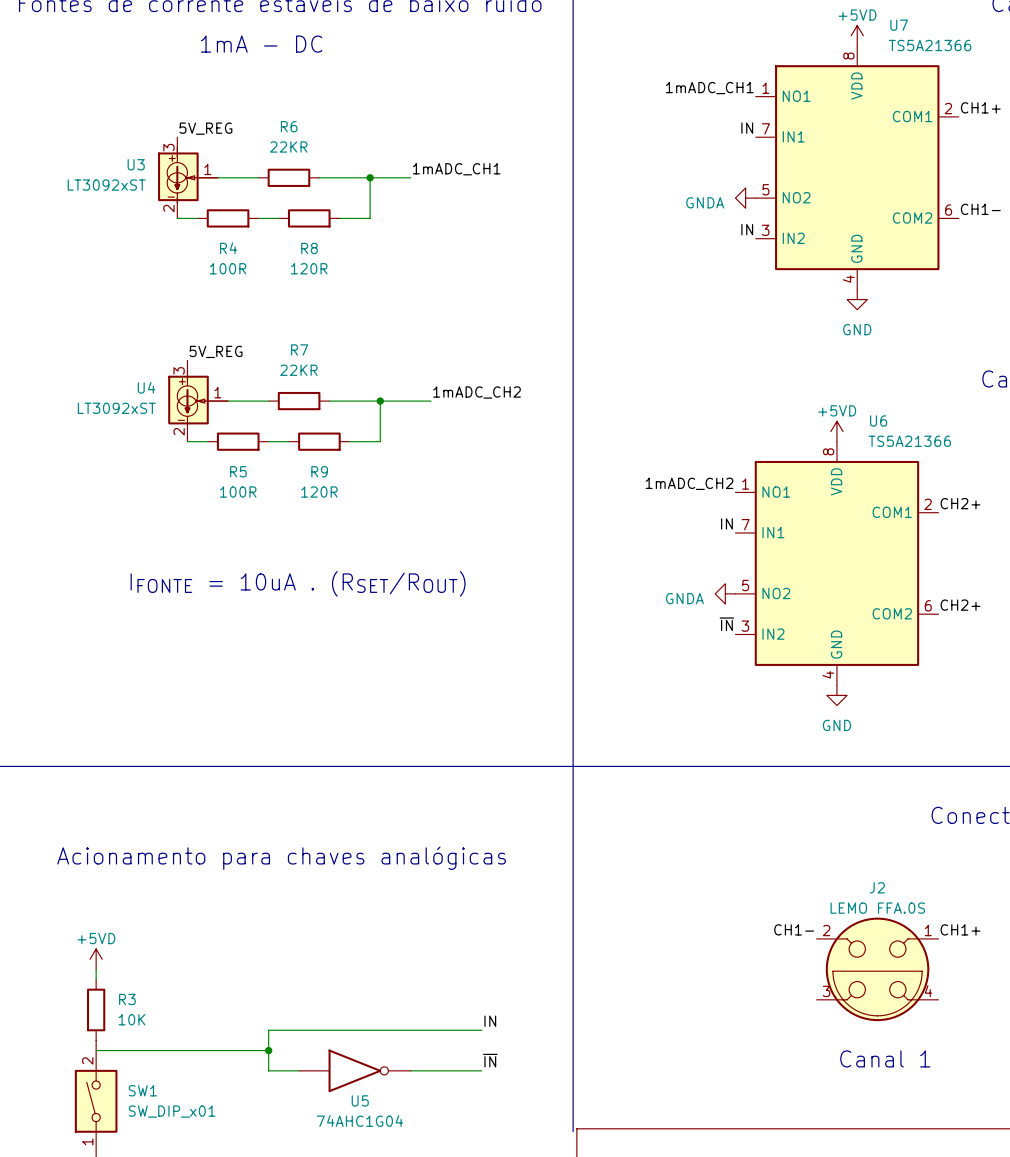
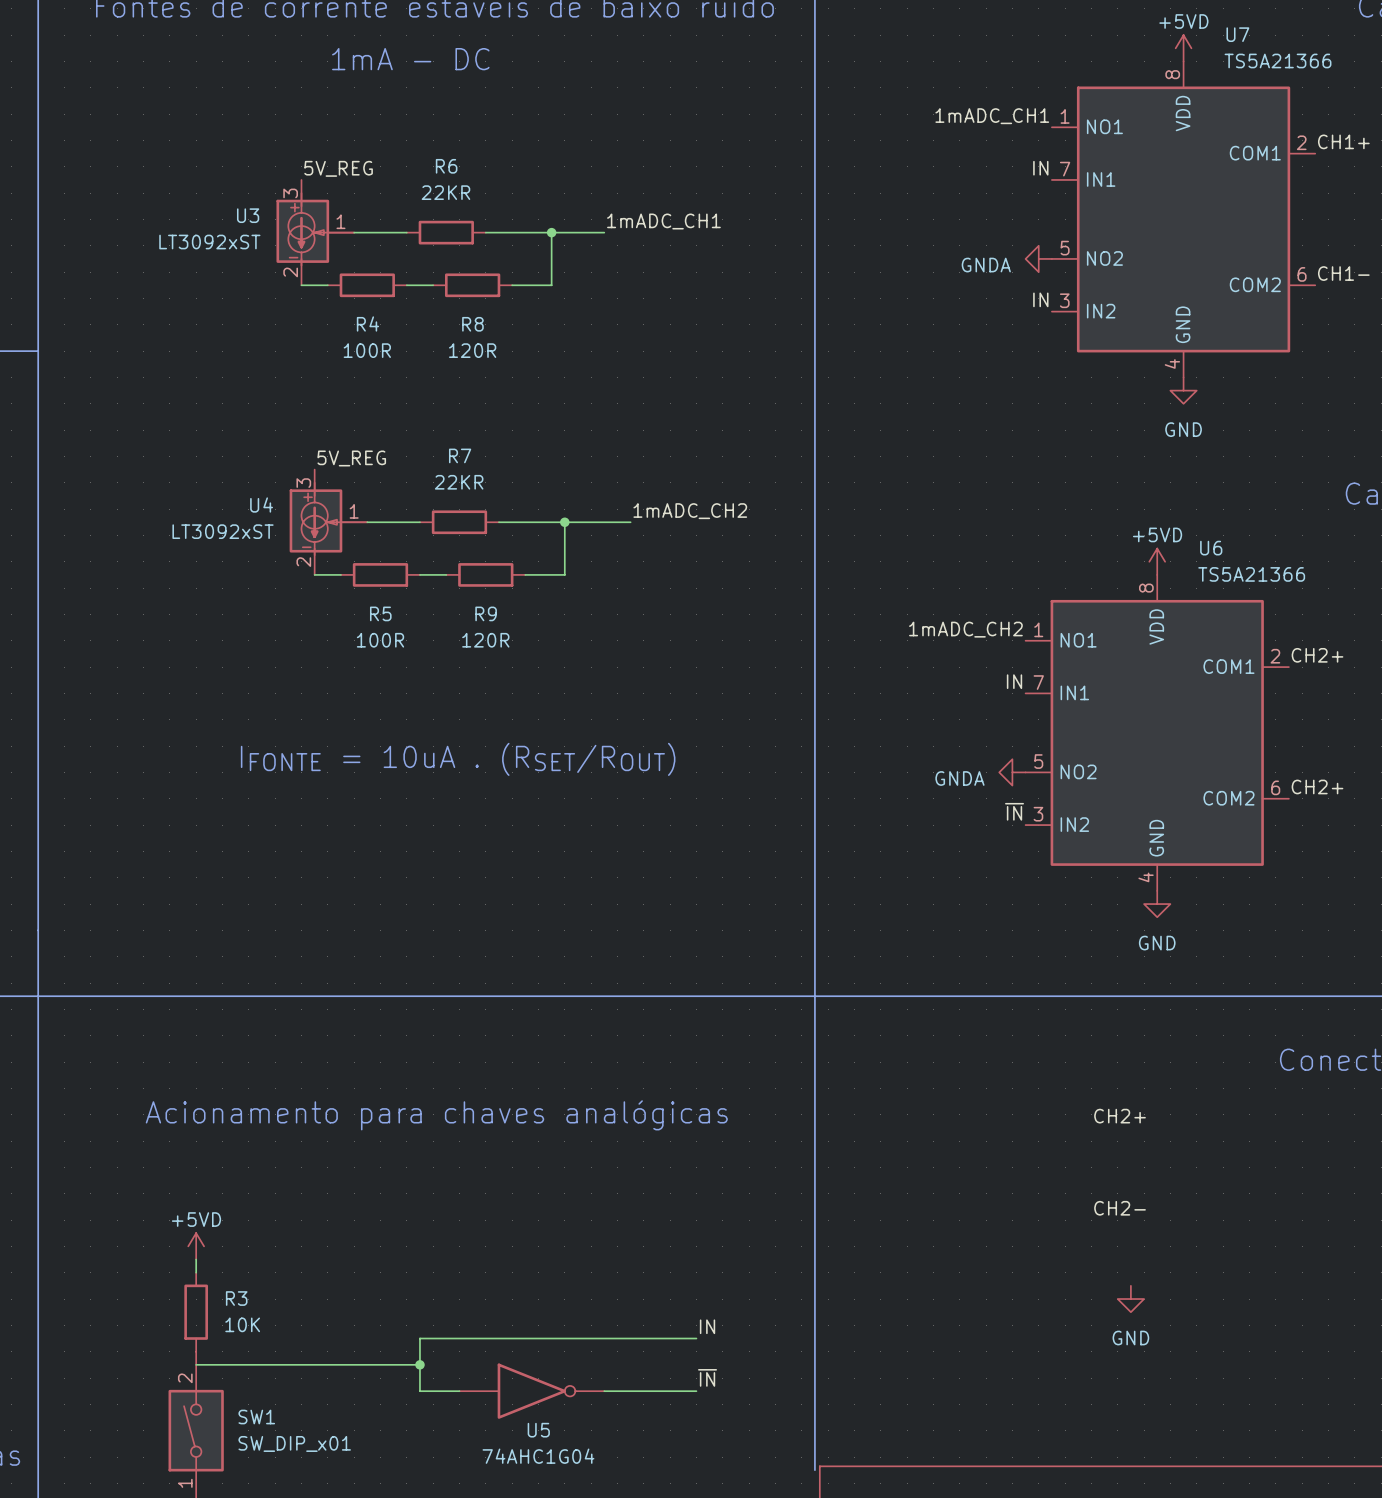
label: none -> CH2+ (1120, 1116)
label: CH1- (794, 929) -> CH2- (1120, 1208)
label: CH1+ (960, 929) -> none
J2: LEMO FFA.0S (877, 969) -> none
power symbol: none -> GND (1130, 1299)
text: Canal 1 (885, 1058) -> none

